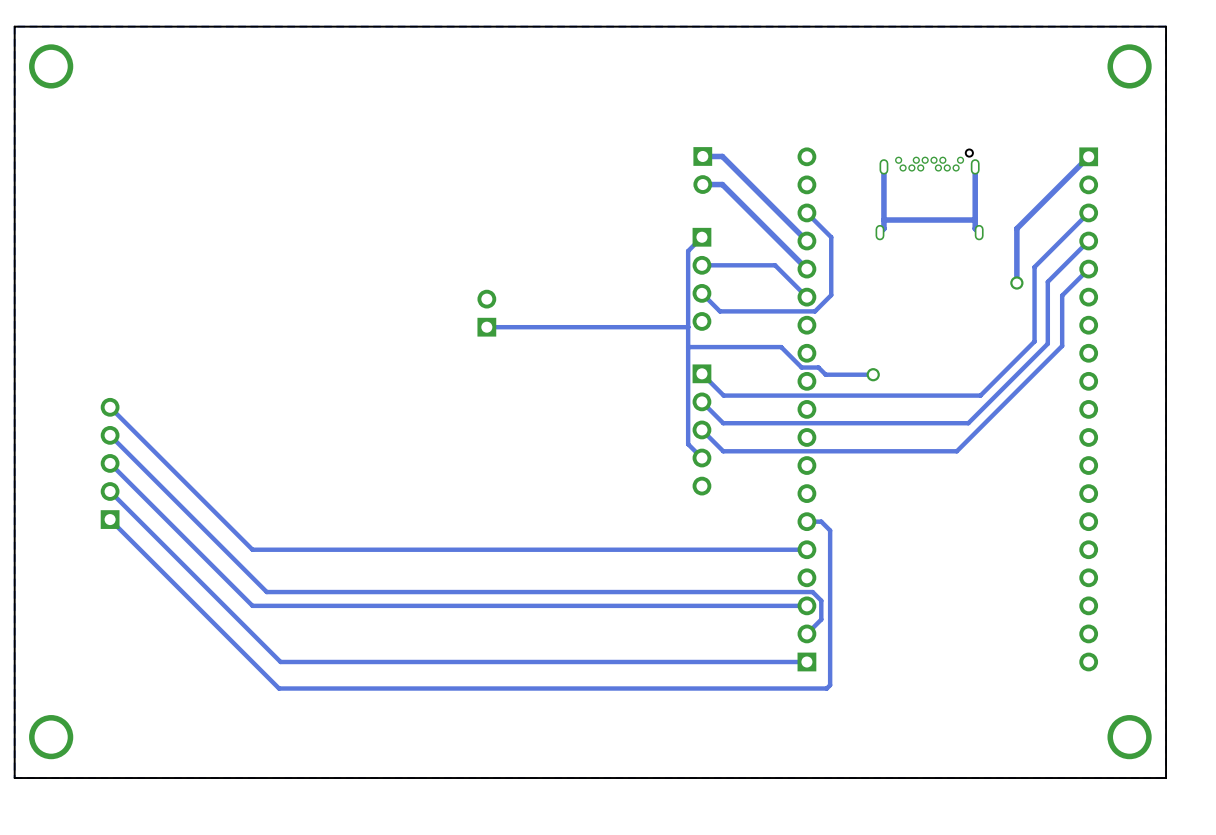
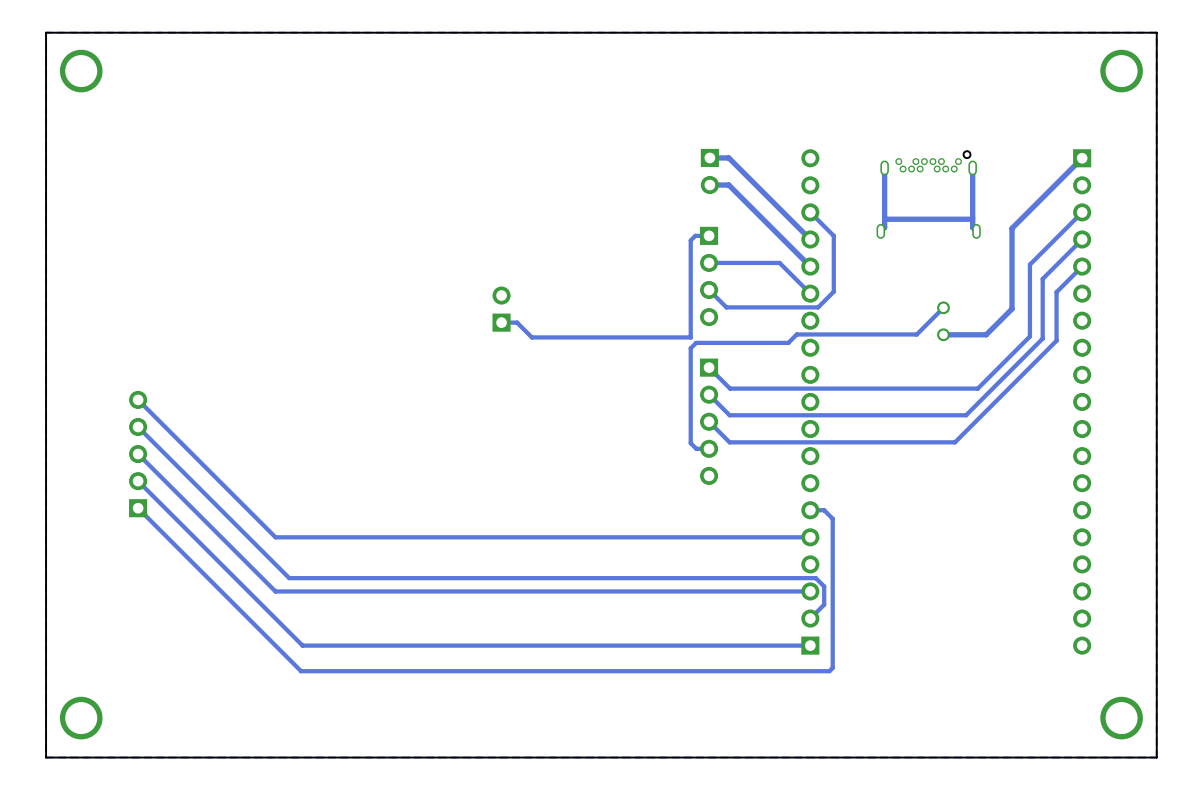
track: (1016, 228) (1016, 283) -> (1012, 227) (1012, 308) (986, 334) (943, 334)
track: (701, 237) (688, 251) (688, 444) (701, 458) -> (943, 307) (916, 334) (796, 334) (788, 342) (696, 342) (690, 348) (690, 443) (696, 448) (709, 448)
via: (1016, 283) -> none
via: none -> (943, 307)
track: (688, 327) (502, 327) -> (709, 235) (695, 235) (690, 240) (690, 337) (531, 337) (517, 322)
via: none -> (943, 334)
track: (688, 347) (781, 347) (801, 367) (818, 367) (825, 374) (873, 374) -> none
via: (873, 374) -> none

